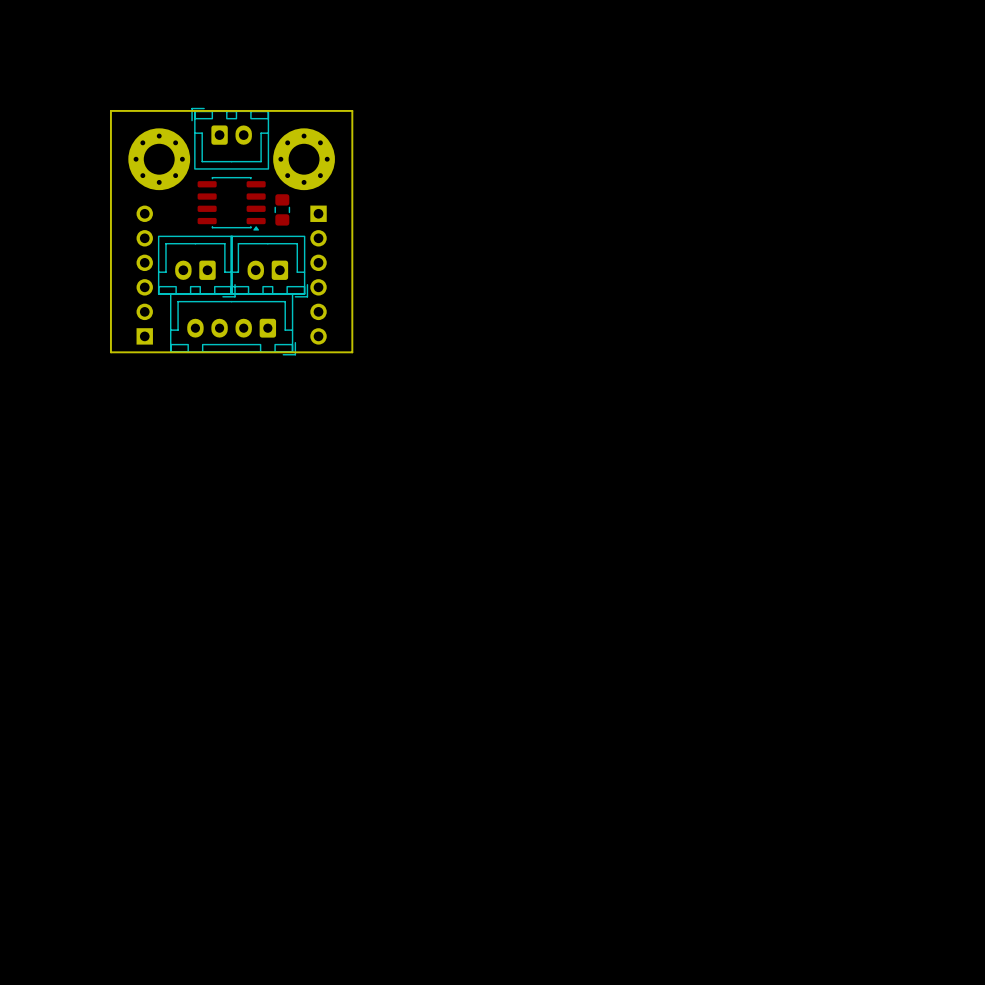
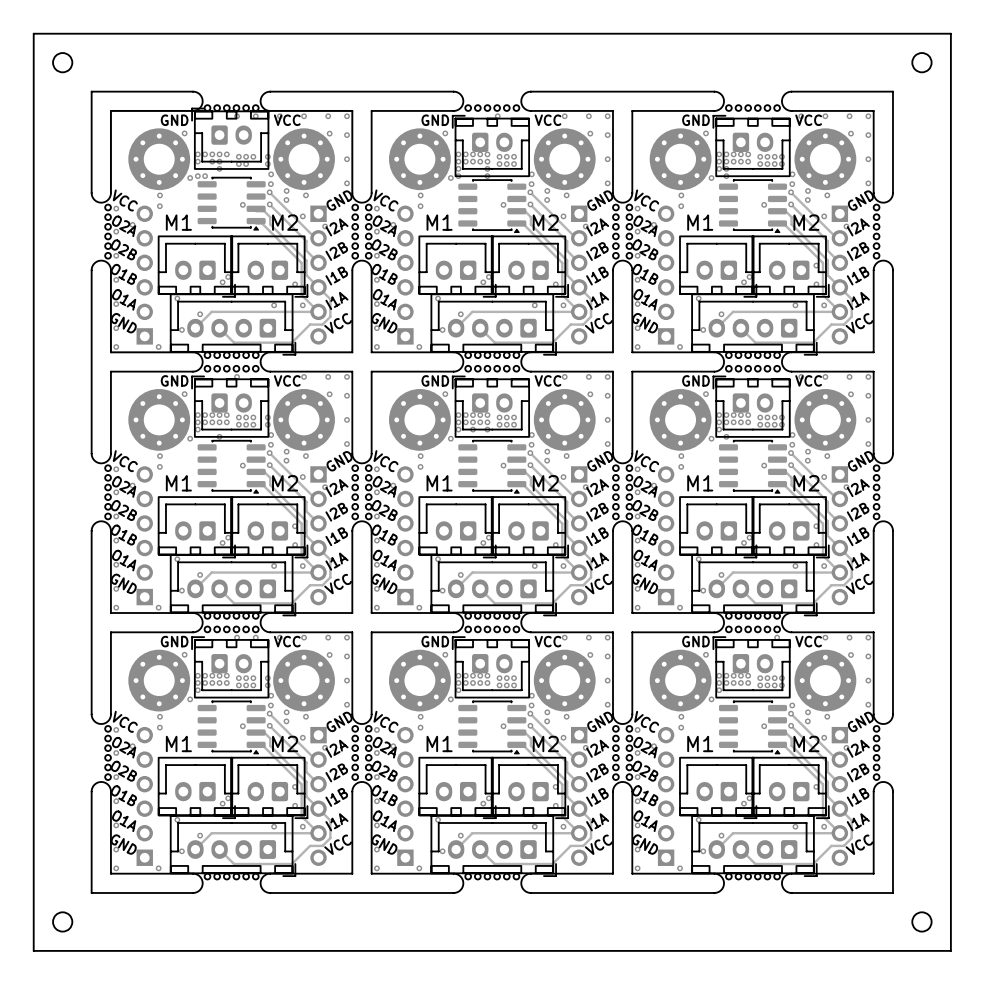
board edge: none -> (33, 33) (950, 33) (950, 950) (33, 950) (33, 33)
round board edge: none -> [52, 52, 73, 73]
round board edge: none -> [912, 52, 932, 73]
board edge: none -> (193, 91) (91, 91) (91, 193)
board edge: none -> (270, 91) (453, 91)
board edge: none -> (530, 91) (714, 91)
board edge: none -> (791, 91) (892, 91) (892, 193)
part: none -> (231, 101)
part: none -> (492, 101)
part: none -> (752, 101)
board edge: (193, 110) (270, 110) -> none
board edge: none -> (453, 110) (371, 110) (371, 193)
board edge: none -> (530, 110) (613, 110) (613, 193)
board edge: none -> (714, 110) (632, 110) (632, 193)
board edge: none -> (791, 110) (873, 110) (873, 193)
via: none -> (237, 116)
via: none -> (255, 116)
via: none -> (279, 116)
via: none -> (304, 116)
via: none -> (328, 116)
via: none -> (347, 116)
via: none -> (497, 116)
via: none -> (564, 116)
via: none -> (588, 116)
via: none -> (607, 116)
via: none -> (801, 116)
via: none -> (825, 116)
via: none -> (849, 116)
via: none -> (868, 116)
text: none -> GND (174, 120)
text: none -> VCC (287, 120)
text: none -> GND (435, 120)
text: none -> VCC (547, 120)
text: none -> GND (695, 120)
text: none -> VCC (808, 120)
via: none -> (184, 133)
via: none -> (329, 133)
via: none -> (445, 133)
via: none -> (590, 133)
via: none -> (705, 133)
via: none -> (851, 133)
via: none -> (347, 135)
via: none -> (607, 135)
via: none -> (868, 135)
part: none -> (490, 146)
part: none -> (751, 146)
via: none -> (197, 154)
via: none -> (205, 154)
via: none -> (212, 154)
via: none -> (219, 154)
via: none -> (226, 154)
via: none -> (458, 154)
via: none -> (465, 154)
via: none -> (473, 154)
via: none -> (480, 154)
via: none -> (487, 154)
via: none -> (719, 154)
via: none -> (726, 154)
via: none -> (733, 154)
via: none -> (740, 154)
via: none -> (748, 154)
via: none -> (238, 156)
via: none -> (246, 156)
via: none -> (253, 156)
via: none -> (267, 156)
via: none -> (499, 156)
via: none -> (506, 156)
via: none -> (514, 156)
via: none -> (760, 156)
via: none -> (767, 156)
via: none -> (774, 156)
via: none -> (781, 156)
via: none -> (347, 159)
part: none -> (419, 159)
part: none -> (564, 159)
via: none -> (607, 159)
part: none -> (680, 159)
part: none -> (825, 159)
via: none -> (868, 159)
via: none -> (197, 161)
via: none -> (212, 161)
via: none -> (219, 161)
via: none -> (458, 161)
via: none -> (465, 161)
via: none -> (473, 161)
via: none -> (480, 161)
via: none -> (487, 161)
via: none -> (719, 161)
via: none -> (726, 161)
via: none -> (733, 161)
via: none -> (740, 161)
via: none -> (748, 161)
via: none -> (238, 164)
via: none -> (246, 164)
via: none -> (267, 164)
via: none -> (499, 164)
via: none -> (506, 164)
via: none -> (514, 164)
via: none -> (760, 164)
via: none -> (767, 164)
via: none -> (774, 164)
via: none -> (781, 164)
via: none -> (219, 168)
via: none -> (458, 168)
via: none -> (487, 168)
via: none -> (719, 168)
via: none -> (726, 168)
via: none -> (271, 174)
via: none -> (531, 174)
via: none -> (792, 174)
via: none -> (197, 176)
via: none -> (205, 176)
via: none -> (458, 176)
via: none -> (487, 176)
via: none -> (726, 176)
via: none -> (190, 178)
via: none -> (450, 178)
via: none -> (711, 178)
via: none -> (347, 183)
via: none -> (607, 183)
via: none -> (868, 183)
via: none -> (270, 184)
via: none -> (531, 184)
via: none -> (792, 184)
via: none -> (286, 190)
via: none -> (547, 190)
via: none -> (808, 190)
track: none -> (269, 192) (315, 238) (318, 238)
via: none -> (269, 192)
track: none -> (530, 192) (576, 238) (579, 238)
via: none -> (530, 192)
track: none -> (791, 192) (836, 238) (839, 238)
via: none -> (791, 192)
board edge: (110, 193) (110, 270) -> none
board edge: (352, 193) (352, 270) -> none
via: none -> (160, 195)
via: none -> (305, 195)
via: none -> (420, 195)
via: none -> (566, 195)
via: none -> (681, 195)
via: none -> (827, 195)
text: none -> VCC (125, 200)
via: none -> (286, 200)
text: none -> GND (339, 200)
text: none -> VCC (385, 200)
via: none -> (547, 200)
text: none -> GND (600, 200)
text: none -> VCC (646, 200)
via: none -> (807, 200)
text: none -> GND (860, 200)
via: none -> (242, 204)
track: none -> (269, 204) (306, 241) (306, 250) (318, 262)
via: none -> (269, 204)
via: none -> (503, 204)
track: none -> (530, 204) (567, 241) (567, 250) (579, 262)
via: none -> (530, 204)
via: none -> (764, 204)
track: none -> (791, 204) (827, 241) (827, 250) (839, 262)
via: none -> (791, 204)
via: none -> (159, 206)
via: none -> (420, 206)
part: none -> (492, 206)
via: none -> (681, 206)
part: none -> (752, 206)
via: none -> (116, 208)
via: none -> (376, 208)
via: none -> (637, 208)
part: (282, 209) -> none
track: none -> (256, 211) (264, 211) (270, 217) (270, 224) (306, 260) (306, 275) (330, 299) (330, 316) (322, 324) (310, 324) (291, 342) (234, 342) (219, 328)
track: none -> (516, 211) (524, 211) (530, 217) (530, 224) (567, 260) (567, 275) (591, 299) (591, 316) (583, 324) (570, 324) (552, 342) (494, 342) (480, 328)
track: none -> (777, 211) (785, 211) (791, 217) (791, 224) (827, 260) (827, 275) (851, 299) (851, 316) (843, 324) (831, 324) (813, 342) (755, 342) (740, 328)
via: none -> (302, 216)
via: none -> (563, 216)
via: none -> (824, 216)
text: none -> M1 (178, 222)
text: none -> M2 (285, 222)
text: none -> M1 (439, 222)
text: none -> M2 (545, 222)
text: none -> M1 (700, 222)
text: none -> M2 (806, 222)
track: none -> (256, 223) (262, 223) (301, 263) (301, 294) (318, 311) (211, 311) (195, 328)
track: none -> (516, 223) (522, 223) (562, 263) (562, 294) (579, 311) (472, 311) (456, 328)
track: none -> (777, 223) (783, 223) (822, 263) (822, 294) (839, 311) (733, 311) (716, 328)
via: none -> (132, 224)
via: none -> (393, 224)
via: none -> (653, 224)
text: none -> O2A (124, 226)
via: none -> (325, 226)
text: none -> O2A (384, 226)
via: none -> (585, 226)
text: none -> O2A (645, 226)
via: none -> (846, 226)
text: none -> I2A (336, 227)
text: none -> I2A (597, 227)
text: none -> I2A (858, 227)
part: none -> (101, 231)
via: none -> (116, 231)
part: none -> (361, 231)
via: none -> (376, 231)
part: none -> (622, 231)
via: none -> (637, 231)
part: none -> (883, 231)
text: none -> O2B (123, 249)
text: none -> O2B (384, 249)
text: none -> O2B (645, 249)
text: none -> I2B (336, 251)
text: none -> I2B (597, 251)
text: none -> I2B (858, 251)
via: none -> (116, 255)
via: none -> (376, 255)
via: none -> (637, 255)
via: none -> (816, 265)
part: none -> (457, 266)
part: none -> (529, 266)
part: none -> (718, 266)
part: none -> (790, 266)
board edge: none -> (91, 270) (91, 453)
board edge: none -> (371, 270) (371, 352) (453, 352)
board edge: none -> (613, 270) (613, 352) (530, 352)
board edge: none -> (632, 270) (632, 352) (714, 352)
board edge: none -> (873, 270) (873, 352) (791, 352)
board edge: none -> (892, 270) (892, 453)
text: none -> O1B (123, 274)
text: none -> O1B (384, 274)
text: none -> O1B (645, 274)
part: none -> (405, 275)
part: none -> (579, 275)
part: none -> (666, 275)
part: none -> (839, 275)
via: none -> (228, 276)
text: none -> I1B (336, 276)
via: none -> (488, 276)
text: none -> I1B (597, 276)
via: none -> (749, 276)
text: none -> I1B (858, 276)
via: none -> (116, 279)
via: none -> (376, 279)
via: none -> (637, 279)
via: none -> (222, 282)
via: none -> (483, 282)
via: none -> (744, 282)
via: none -> (295, 284)
via: none -> (555, 284)
via: none -> (816, 284)
via: none -> (177, 298)
via: none -> (438, 298)
via: none -> (698, 298)
text: none -> O1A (124, 299)
text: none -> O1A (384, 299)
text: none -> O1A (645, 299)
text: none -> I1A (336, 300)
text: none -> I1A (597, 300)
text: none -> I1A (858, 300)
via: none -> (116, 304)
via: none -> (376, 304)
via: none -> (637, 304)
via: none -> (274, 305)
via: none -> (302, 305)
via: none -> (534, 305)
via: none -> (563, 305)
via: none -> (795, 305)
via: none -> (824, 305)
via: none -> (200, 314)
via: none -> (460, 314)
via: none -> (721, 314)
text: none -> GND (123, 323)
text: none -> VCC (338, 323)
text: none -> GND (384, 323)
text: none -> VCC (598, 323)
text: none -> GND (645, 323)
text: none -> VCC (859, 323)
part: none -> (493, 324)
part: none -> (754, 324)
via: none -> (116, 328)
via: none -> (376, 328)
via: none -> (637, 328)
via: none -> (181, 329)
via: none -> (442, 329)
via: none -> (703, 329)
via: none -> (116, 347)
via: none -> (158, 347)
via: none -> (376, 347)
via: none -> (419, 347)
via: none -> (637, 347)
via: none -> (680, 347)
board edge: (193, 352) (270, 352) -> none
part: none -> (231, 361)
part: none -> (492, 361)
part: none -> (752, 361)
board edge: none -> (193, 371) (110, 371) (110, 453)
board edge: none -> (270, 371) (352, 371) (352, 453)
board edge: none -> (453, 371) (371, 371) (371, 453)
board edge: none -> (530, 371) (613, 371) (613, 453)
board edge: none -> (714, 371) (632, 371) (632, 453)
board edge: none -> (791, 371) (873, 371) (873, 453)
via: none -> (237, 376)
via: none -> (304, 376)
via: none -> (328, 376)
via: none -> (347, 376)
via: none -> (564, 376)
via: none -> (588, 376)
via: none -> (607, 376)
via: none -> (801, 376)
via: none -> (825, 376)
via: none -> (849, 376)
via: none -> (868, 376)
text: none -> GND (174, 380)
text: none -> VCC (287, 380)
text: none -> GND (435, 380)
text: none -> VCC (547, 380)
text: none -> GND (695, 380)
text: none -> VCC (808, 380)
via: none -> (184, 394)
via: none -> (329, 394)
via: none -> (445, 394)
via: none -> (590, 394)
via: none -> (705, 394)
via: none -> (851, 394)
via: none -> (347, 395)
via: none -> (607, 395)
via: none -> (868, 395)
part: none -> (230, 406)
part: none -> (490, 406)
part: none -> (751, 406)
via: none -> (197, 415)
via: none -> (205, 415)
via: none -> (212, 415)
via: none -> (219, 415)
via: none -> (226, 415)
via: none -> (458, 415)
via: none -> (465, 415)
via: none -> (473, 415)
via: none -> (480, 415)
via: none -> (487, 415)
via: none -> (719, 415)
via: none -> (726, 415)
via: none -> (733, 415)
via: none -> (740, 415)
via: none -> (748, 415)
via: none -> (238, 417)
via: none -> (246, 417)
via: none -> (253, 417)
via: none -> (267, 417)
via: none -> (499, 417)
via: none -> (506, 417)
via: none -> (514, 417)
via: none -> (760, 417)
via: none -> (767, 417)
via: none -> (774, 417)
via: none -> (781, 417)
part: none -> (159, 419)
part: none -> (304, 419)
via: none -> (347, 419)
part: none -> (419, 419)
part: none -> (564, 419)
via: none -> (607, 419)
part: none -> (680, 419)
part: none -> (825, 419)
via: none -> (868, 419)
via: none -> (197, 422)
via: none -> (205, 422)
via: none -> (212, 422)
via: none -> (219, 422)
via: none -> (226, 422)
via: none -> (458, 422)
via: none -> (465, 422)
via: none -> (473, 422)
via: none -> (480, 422)
via: none -> (487, 422)
via: none -> (719, 422)
via: none -> (726, 422)
via: none -> (733, 422)
via: none -> (740, 422)
via: none -> (748, 422)
via: none -> (238, 424)
via: none -> (246, 424)
via: none -> (253, 424)
via: none -> (267, 424)
via: none -> (499, 424)
via: none -> (506, 424)
via: none -> (514, 424)
via: none -> (760, 424)
via: none -> (767, 424)
via: none -> (774, 424)
via: none -> (781, 424)
via: none -> (197, 429)
via: none -> (458, 429)
via: none -> (473, 429)
via: none -> (487, 429)
via: none -> (719, 429)
via: none -> (271, 435)
via: none -> (531, 435)
via: none -> (792, 435)
via: none -> (219, 436)
via: none -> (726, 436)
via: none -> (190, 438)
via: none -> (450, 438)
via: none -> (711, 438)
via: none -> (270, 444)
via: none -> (347, 444)
via: none -> (531, 444)
via: none -> (607, 444)
via: none -> (792, 444)
via: none -> (868, 444)
via: none -> (286, 451)
via: none -> (547, 451)
via: none -> (808, 451)
track: none -> (269, 453) (315, 498) (318, 498)
via: none -> (269, 453)
track: none -> (530, 453) (576, 498) (579, 498)
via: none -> (530, 453)
track: none -> (791, 453) (836, 498) (839, 498)
via: none -> (791, 453)
via: none -> (160, 456)
via: none -> (305, 456)
via: none -> (420, 456)
via: none -> (566, 456)
via: none -> (681, 456)
via: none -> (827, 456)
via: none -> (286, 460)
via: none -> (547, 460)
via: none -> (807, 460)
text: none -> VCC (125, 461)
text: none -> GND (339, 461)
text: none -> VCC (385, 461)
text: none -> GND (600, 461)
text: none -> VCC (646, 461)
text: none -> GND (860, 461)
via: none -> (242, 465)
track: none -> (269, 465) (306, 501) (306, 511) (318, 523)
via: none -> (269, 465)
via: none -> (503, 465)
track: none -> (530, 465) (567, 501) (567, 511) (579, 523)
via: none -> (530, 465)
via: none -> (764, 465)
track: none -> (791, 465) (827, 501) (827, 511) (839, 523)
via: none -> (791, 465)
via: none -> (159, 466)
part: none -> (231, 466)
via: none -> (420, 466)
part: none -> (492, 466)
via: none -> (681, 466)
part: none -> (752, 466)
via: none -> (116, 469)
via: none -> (376, 469)
via: none -> (637, 469)
track: none -> (256, 471) (264, 471) (270, 477) (270, 485) (306, 521) (306, 535) (330, 559) (330, 577) (322, 585) (310, 585) (291, 603) (234, 603) (219, 588)
track: none -> (516, 471) (524, 471) (530, 477) (530, 485) (567, 521) (567, 535) (591, 559) (591, 577) (583, 585) (570, 585) (552, 603) (494, 603) (480, 588)
track: none -> (777, 471) (785, 471) (791, 477) (791, 485) (827, 521) (827, 535) (851, 559) (851, 577) (843, 585) (831, 585) (813, 603) (755, 603) (740, 588)
via: none -> (302, 477)
via: none -> (563, 477)
via: none -> (824, 477)
text: none -> M1 (178, 483)
text: none -> M2 (285, 483)
text: none -> M1 (439, 483)
text: none -> M2 (545, 483)
text: none -> M1 (700, 483)
text: none -> M2 (806, 483)
track: none -> (256, 484) (262, 484) (301, 523) (301, 555) (318, 572) (211, 572) (195, 588)
track: none -> (516, 484) (522, 484) (562, 523) (562, 555) (579, 572) (472, 572) (456, 588)
track: none -> (777, 484) (783, 484) (822, 523) (822, 555) (839, 572) (733, 572) (716, 588)
via: none -> (132, 485)
via: none -> (393, 485)
via: none -> (653, 485)
text: none -> O2A (124, 487)
via: none -> (325, 487)
text: none -> O2A (384, 487)
via: none -> (585, 487)
text: none -> O2A (645, 487)
via: none -> (846, 487)
text: none -> I2A (336, 488)
text: none -> I2A (597, 488)
text: none -> I2A (858, 488)
part: none -> (101, 492)
via: none -> (116, 492)
part: none -> (361, 492)
via: none -> (376, 492)
part: none -> (622, 492)
via: none -> (637, 492)
part: none -> (883, 492)
text: none -> O2B (123, 510)
text: none -> O2B (384, 510)
text: none -> O2B (645, 510)
text: none -> I2B (336, 512)
text: none -> I2B (597, 512)
text: none -> I2B (858, 512)
via: none -> (116, 516)
via: none -> (376, 516)
via: none -> (637, 516)
via: none -> (294, 526)
via: none -> (816, 526)
part: none -> (196, 527)
part: none -> (269, 527)
part: none -> (457, 527)
part: none -> (529, 527)
part: none -> (718, 527)
part: none -> (790, 527)
board edge: none -> (91, 530) (91, 714)
board edge: none -> (110, 530) (110, 613) (193, 613)
board edge: none -> (352, 530) (352, 613) (270, 613)
board edge: none -> (371, 530) (371, 613) (453, 613)
board edge: none -> (613, 530) (613, 613) (530, 613)
board edge: none -> (632, 530) (632, 613) (714, 613)
board edge: none -> (873, 530) (873, 613) (791, 613)
board edge: none -> (892, 530) (892, 714)
text: none -> O1B (123, 535)
part: none -> (144, 535)
part: none -> (318, 535)
text: none -> O1B (384, 535)
part: none -> (405, 535)
part: none -> (579, 535)
text: none -> O1B (645, 535)
part: none -> (666, 535)
part: none -> (839, 535)
text: none -> I1B (336, 536)
text: none -> I1B (597, 536)
text: none -> I1B (858, 536)
via: none -> (228, 537)
via: none -> (488, 537)
via: none -> (749, 537)
via: none -> (116, 540)
via: none -> (376, 540)
via: none -> (637, 540)
via: none -> (222, 542)
via: none -> (483, 542)
via: none -> (744, 542)
via: none -> (295, 545)
via: none -> (555, 545)
via: none -> (816, 545)
via: none -> (177, 559)
via: none -> (438, 559)
via: none -> (698, 559)
text: none -> O1A (124, 560)
text: none -> O1A (384, 560)
text: none -> O1A (645, 560)
text: none -> I1A (336, 561)
text: none -> I1A (597, 561)
text: none -> I1A (858, 561)
via: none -> (116, 564)
via: none -> (376, 564)
via: none -> (637, 564)
via: none -> (274, 566)
via: none -> (302, 566)
via: none -> (534, 566)
via: none -> (563, 566)
via: none -> (795, 566)
via: none -> (824, 566)
via: none -> (200, 574)
via: none -> (460, 574)
via: none -> (721, 574)
text: none -> GND (123, 583)
text: none -> GND (384, 583)
text: none -> GND (645, 583)
text: none -> VCC (338, 584)
text: none -> VCC (598, 584)
text: none -> VCC (859, 584)
part: none -> (233, 585)
part: none -> (493, 585)
part: none -> (754, 585)
via: none -> (116, 588)
via: none -> (376, 588)
via: none -> (637, 588)
via: none -> (181, 590)
via: none -> (442, 590)
via: none -> (703, 590)
via: none -> (116, 607)
via: none -> (158, 607)
via: none -> (376, 607)
via: none -> (419, 607)
via: none -> (637, 607)
via: none -> (680, 607)
part: none -> (231, 622)
part: none -> (492, 622)
part: none -> (752, 622)
board edge: none -> (193, 632) (110, 632) (110, 714)
board edge: none -> (270, 632) (352, 632) (352, 714)
board edge: none -> (453, 632) (371, 632) (371, 714)
board edge: none -> (530, 632) (613, 632) (613, 714)
board edge: none -> (714, 632) (632, 632) (632, 714)
board edge: none -> (791, 632) (873, 632) (873, 714)
via: none -> (237, 637)
via: none -> (255, 637)
via: none -> (279, 637)
via: none -> (304, 637)
via: none -> (328, 637)
via: none -> (347, 637)
via: none -> (564, 637)
via: none -> (588, 637)
via: none -> (607, 637)
via: none -> (777, 637)
via: none -> (825, 637)
via: none -> (849, 637)
via: none -> (868, 637)
text: none -> GND (174, 641)
text: none -> VCC (287, 641)
text: none -> GND (435, 641)
text: none -> VCC (547, 641)
text: none -> GND (695, 641)
text: none -> VCC (808, 641)
via: none -> (184, 654)
via: none -> (329, 654)
via: none -> (445, 654)
via: none -> (590, 654)
via: none -> (705, 654)
via: none -> (851, 654)
via: none -> (347, 656)
via: none -> (607, 656)
via: none -> (868, 656)
part: none -> (230, 667)
part: none -> (490, 667)
part: none -> (751, 667)
via: none -> (197, 675)
via: none -> (205, 675)
via: none -> (212, 675)
via: none -> (219, 675)
via: none -> (226, 675)
via: none -> (458, 675)
via: none -> (465, 675)
via: none -> (473, 675)
via: none -> (480, 675)
via: none -> (487, 675)
via: none -> (719, 675)
via: none -> (726, 675)
via: none -> (733, 675)
via: none -> (740, 675)
via: none -> (748, 675)
via: none -> (238, 678)
via: none -> (246, 678)
via: none -> (253, 678)
via: none -> (267, 678)
via: none -> (499, 678)
via: none -> (506, 678)
via: none -> (514, 678)
via: none -> (760, 678)
via: none -> (767, 678)
via: none -> (774, 678)
via: none -> (781, 678)
part: none -> (159, 680)
part: none -> (304, 680)
via: none -> (347, 680)
part: none -> (419, 680)
part: none -> (564, 680)
via: none -> (607, 680)
part: none -> (680, 680)
part: none -> (825, 680)
via: none -> (868, 680)
via: none -> (197, 682)
via: none -> (205, 682)
via: none -> (212, 682)
via: none -> (219, 682)
via: none -> (226, 682)
via: none -> (458, 682)
via: none -> (465, 682)
via: none -> (473, 682)
via: none -> (480, 682)
via: none -> (487, 682)
via: none -> (719, 682)
via: none -> (726, 682)
via: none -> (733, 682)
via: none -> (740, 682)
via: none -> (748, 682)
via: none -> (238, 685)
via: none -> (246, 685)
via: none -> (253, 685)
via: none -> (267, 685)
via: none -> (499, 685)
via: none -> (506, 685)
via: none -> (514, 685)
via: none -> (760, 685)
via: none -> (767, 685)
via: none -> (774, 685)
via: none -> (781, 685)
via: none -> (197, 690)
via: none -> (458, 690)
via: none -> (719, 690)
via: none -> (271, 695)
via: none -> (531, 695)
via: none -> (190, 699)
via: none -> (450, 699)
via: none -> (711, 699)
via: none -> (347, 704)
via: none -> (607, 704)
via: none -> (868, 704)
via: none -> (270, 705)
via: none -> (531, 705)
via: none -> (792, 705)
via: none -> (286, 712)
via: none -> (547, 712)
via: none -> (808, 712)
track: none -> (269, 713) (315, 759) (318, 759)
via: none -> (269, 713)
track: none -> (530, 713) (576, 759) (579, 759)
via: none -> (530, 713)
track: none -> (791, 713) (836, 759) (839, 759)
via: none -> (791, 713)
via: none -> (160, 716)
via: none -> (305, 716)
via: none -> (420, 716)
via: none -> (566, 716)
via: none -> (681, 716)
via: none -> (827, 716)
text: none -> VCC (125, 721)
via: none -> (286, 721)
text: none -> GND (339, 721)
text: none -> VCC (385, 721)
via: none -> (547, 721)
text: none -> GND (600, 721)
text: none -> VCC (646, 721)
via: none -> (807, 721)
text: none -> GND (860, 721)
track: none -> (269, 725) (306, 762) (306, 772) (318, 784)
via: none -> (269, 725)
track: none -> (530, 725) (567, 762) (567, 772) (579, 784)
via: none -> (530, 725)
track: none -> (791, 725) (827, 762) (827, 772) (839, 784)
via: none -> (791, 725)
via: none -> (242, 726)
via: none -> (503, 726)
via: none -> (764, 726)
via: none -> (159, 727)
part: none -> (231, 727)
via: none -> (420, 727)
part: none -> (492, 727)
via: none -> (681, 727)
part: none -> (752, 727)
via: none -> (116, 729)
via: none -> (376, 729)
via: none -> (637, 729)
track: none -> (256, 732) (264, 732) (270, 738) (270, 745) (306, 781) (306, 796) (330, 820) (330, 838) (322, 845) (310, 845) (291, 864) (234, 864) (219, 849)
track: none -> (516, 732) (524, 732) (530, 738) (530, 745) (567, 781) (567, 796) (591, 820) (591, 838) (583, 845) (570, 845) (552, 864) (494, 864) (480, 849)
track: none -> (777, 732) (785, 732) (791, 738) (791, 745) (827, 781) (827, 796) (851, 820) (851, 838) (843, 845) (831, 845) (813, 864) (755, 864) (740, 849)
via: none -> (302, 737)
via: none -> (563, 737)
via: none -> (824, 737)
text: none -> M1 (178, 743)
text: none -> M2 (285, 743)
text: none -> M1 (439, 743)
text: none -> M2 (545, 743)
text: none -> M1 (700, 743)
text: none -> M2 (806, 743)
track: none -> (256, 744) (262, 744) (301, 784) (301, 816) (318, 833) (211, 833) (195, 849)
track: none -> (516, 744) (522, 744) (562, 784) (562, 816) (579, 833) (472, 833) (456, 849)
track: none -> (777, 744) (783, 744) (822, 784) (822, 816) (839, 833) (733, 833) (716, 849)
via: none -> (132, 746)
via: none -> (393, 746)
via: none -> (653, 746)
text: none -> O2A (124, 747)
via: none -> (325, 747)
text: none -> O2A (384, 747)
via: none -> (585, 747)
text: none -> O2A (645, 747)
via: none -> (846, 747)
text: none -> I2A (336, 748)
text: none -> I2A (597, 748)
text: none -> I2A (858, 748)
part: none -> (101, 752)
via: none -> (116, 752)
part: none -> (361, 752)
via: none -> (376, 752)
part: none -> (622, 752)
via: none -> (637, 752)
part: none -> (883, 752)
text: none -> O2B (123, 771)
text: none -> O2B (384, 771)
text: none -> O2B (645, 771)
text: none -> I2B (336, 772)
text: none -> I2B (597, 772)
text: none -> I2B (858, 772)
via: none -> (116, 777)
via: none -> (376, 777)
via: none -> (637, 777)
via: none -> (294, 786)
via: none -> (555, 786)
via: none -> (816, 786)
part: none -> (196, 787)
part: none -> (269, 787)
part: none -> (457, 787)
part: none -> (529, 787)
part: none -> (718, 787)
part: none -> (790, 787)
board edge: none -> (91, 791) (91, 892) (193, 892)
board edge: none -> (110, 791) (110, 873) (193, 873)
board edge: none -> (352, 791) (352, 873) (270, 873)
board edge: none -> (371, 791) (371, 873) (453, 873)
board edge: none -> (613, 791) (613, 873) (530, 873)
board edge: none -> (632, 791) (632, 873) (714, 873)
board edge: none -> (873, 791) (873, 873) (791, 873)
board edge: none -> (892, 791) (892, 892) (791, 892)
text: none -> O1B (123, 795)
text: none -> O1B (384, 795)
text: none -> O1B (645, 795)
part: none -> (144, 796)
part: none -> (318, 796)
part: none -> (405, 796)
part: none -> (579, 796)
part: none -> (666, 796)
part: none -> (839, 796)
text: none -> I1B (336, 797)
text: none -> I1B (597, 797)
text: none -> I1B (858, 797)
via: none -> (228, 798)
via: none -> (488, 798)
via: none -> (749, 798)
via: none -> (116, 801)
via: none -> (376, 801)
via: none -> (637, 801)
via: none -> (222, 803)
via: none -> (483, 803)
via: none -> (744, 803)
via: none -> (295, 805)
via: none -> (555, 805)
via: none -> (177, 819)
via: none -> (438, 819)
via: none -> (698, 819)
text: none -> O1A (124, 821)
text: none -> O1A (384, 821)
text: none -> O1A (645, 821)
text: none -> I1A (336, 822)
text: none -> I1A (597, 822)
text: none -> I1A (858, 822)
via: none -> (116, 825)
via: none -> (376, 825)
via: none -> (637, 825)
via: none -> (274, 826)
via: none -> (302, 826)
via: none -> (534, 826)
via: none -> (563, 826)
via: none -> (795, 826)
via: none -> (824, 826)
via: none -> (200, 835)
via: none -> (460, 835)
via: none -> (721, 835)
text: none -> GND (123, 844)
text: none -> VCC (338, 844)
text: none -> GND (384, 844)
text: none -> VCC (598, 844)
text: none -> GND (645, 844)
text: none -> VCC (859, 844)
part: none -> (233, 845)
part: none -> (493, 845)
part: none -> (754, 845)
via: none -> (116, 849)
via: none -> (376, 849)
via: none -> (637, 849)
via: none -> (181, 851)
via: none -> (442, 851)
via: none -> (703, 851)
via: none -> (116, 868)
via: none -> (158, 868)
via: none -> (376, 868)
via: none -> (419, 868)
via: none -> (637, 868)
via: none -> (680, 868)
part: none -> (231, 883)
part: none -> (492, 883)
part: none -> (752, 883)
board edge: none -> (270, 892) (453, 892)
board edge: none -> (530, 892) (714, 892)
round board edge: none -> [52, 912, 73, 932]
round board edge: none -> [912, 912, 932, 932]

